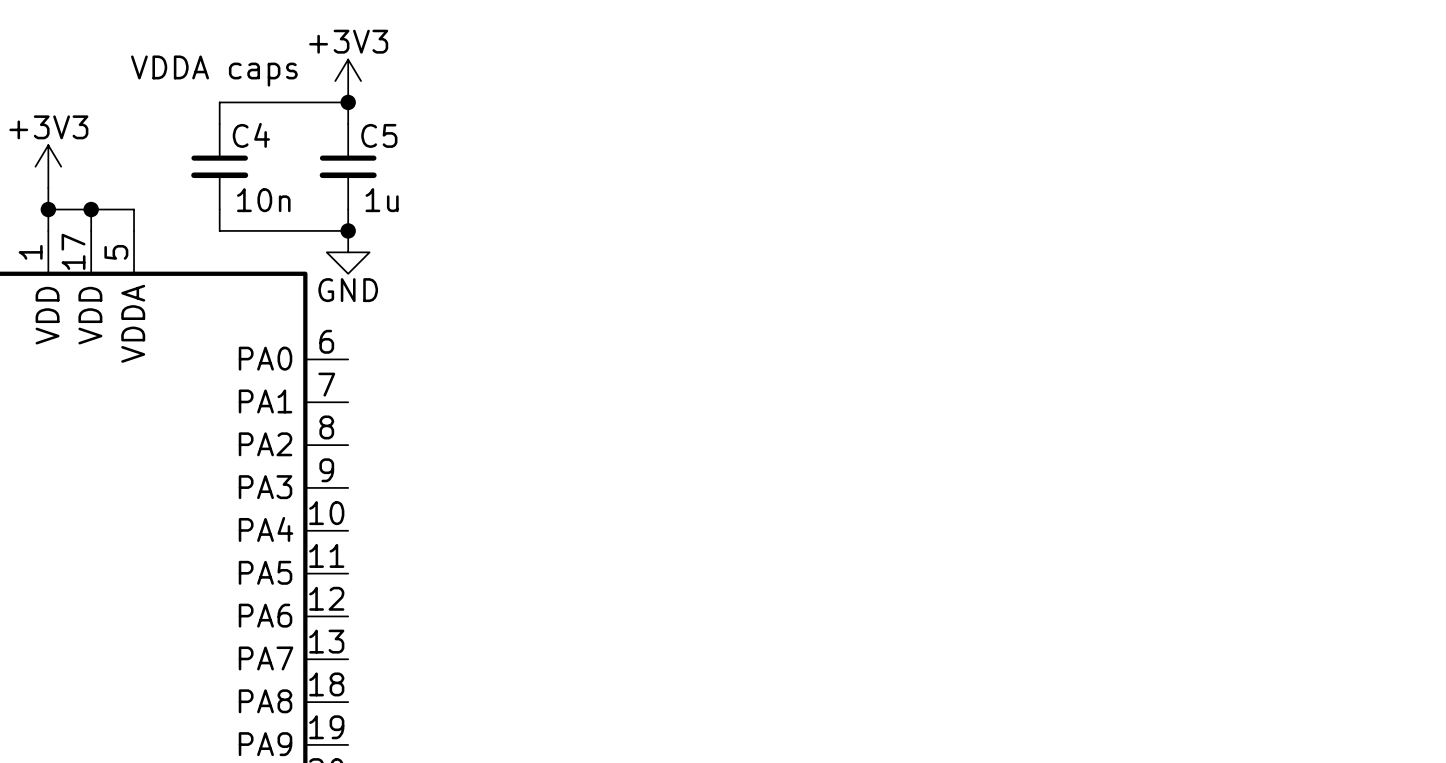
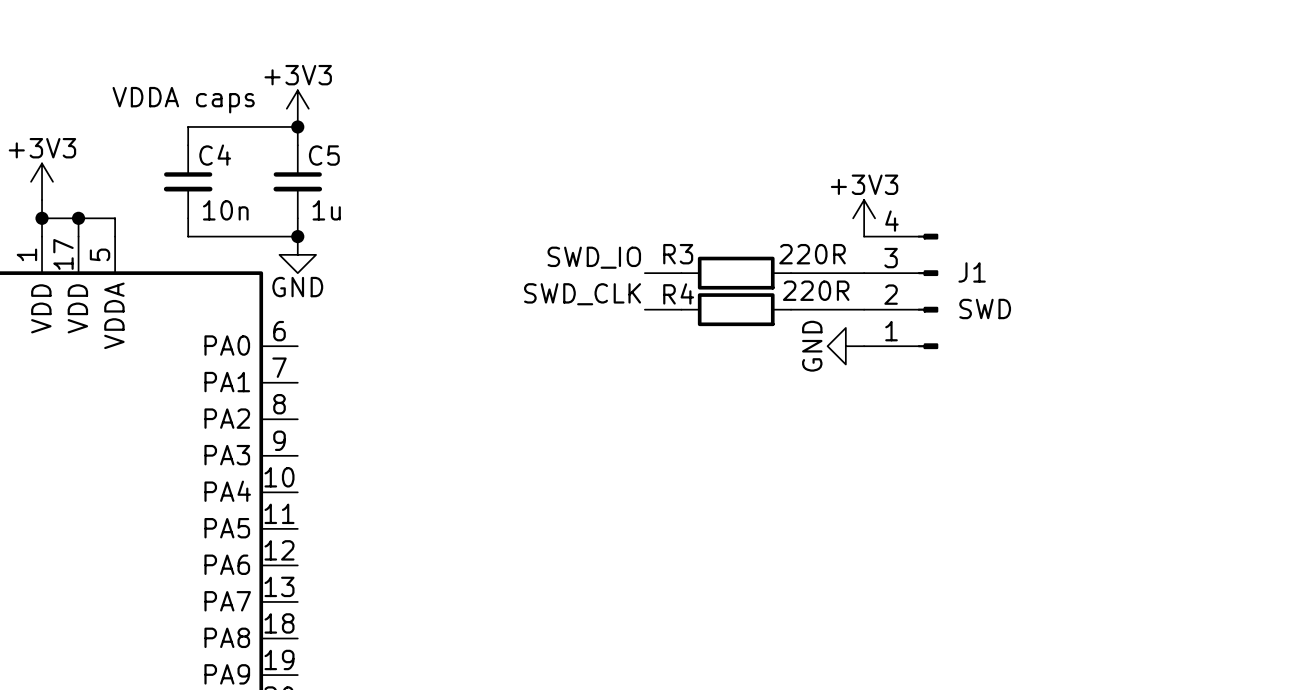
power symbol: none -> +3V3 (864, 218)
label: none -> SWD_IO (594, 257)
wire: none -> (644, 273) (681, 273)
R3: none -> 220R (736, 273)
wire: none -> (791, 273) (864, 273)
J1: none -> SWD (901, 291)
label: none -> SWD_CLK (582, 294)
wire: none -> (644, 309) (681, 309)
R4: none -> 220R (736, 309)
wire: none -> (791, 309) (864, 309)
power symbol: none -> GND (845, 346)

